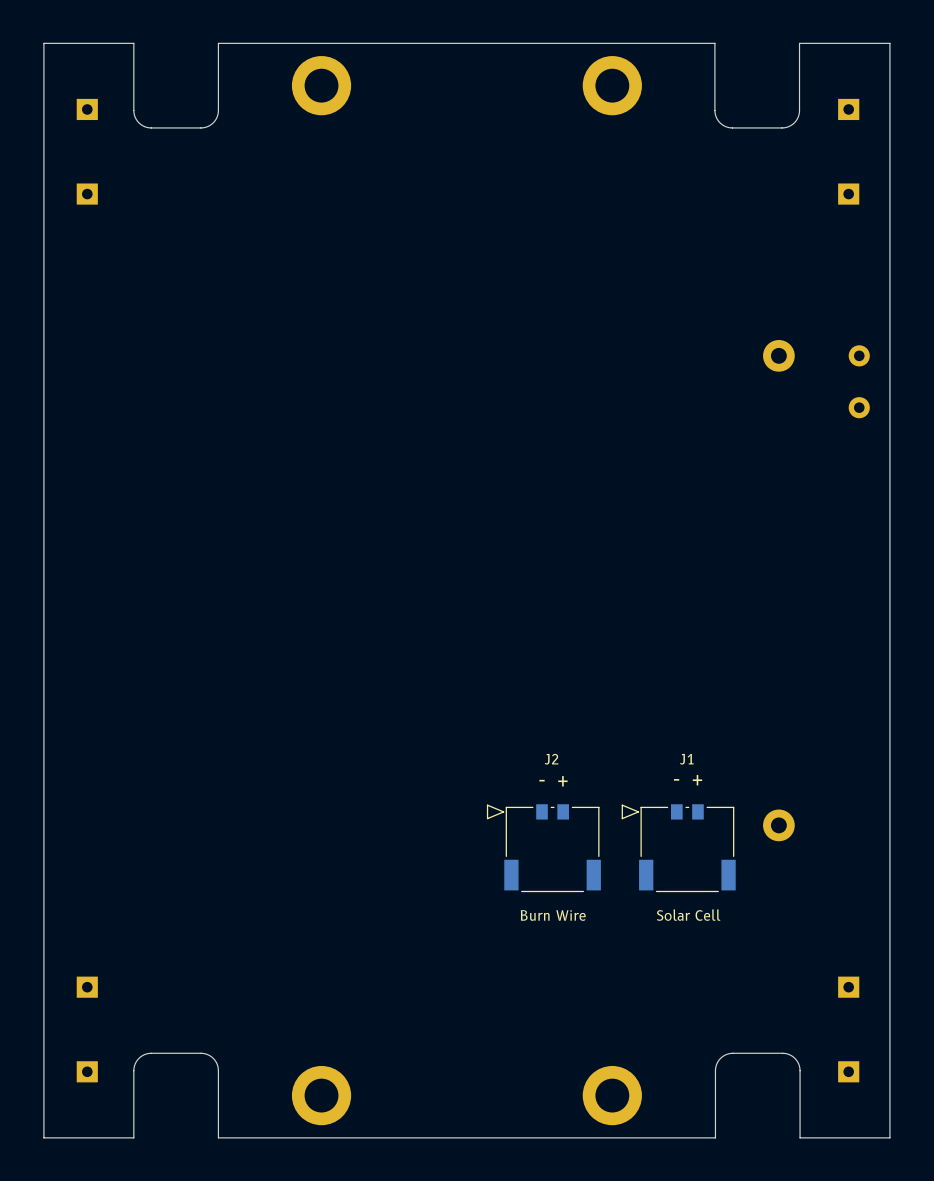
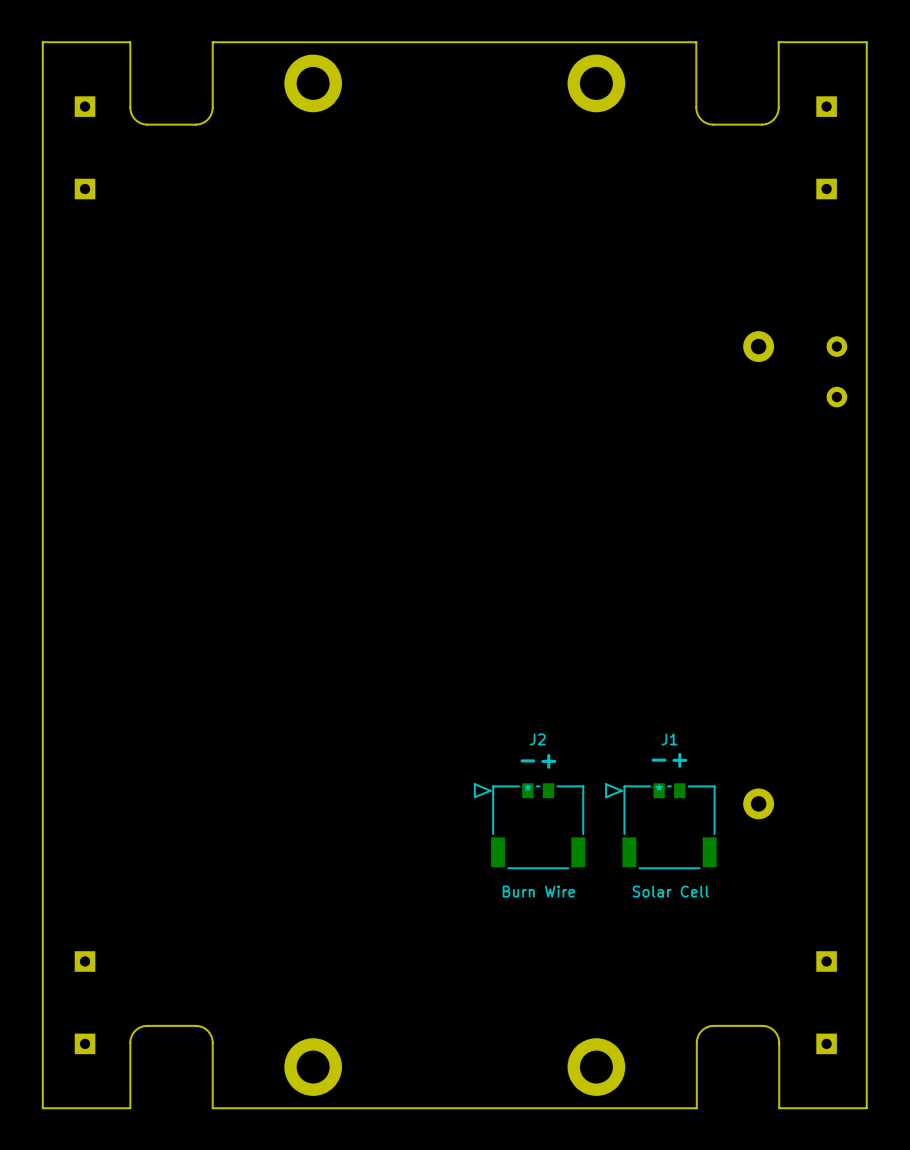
J2 text: none -> * (527, 787)
J1 text: none -> * (659, 787)

